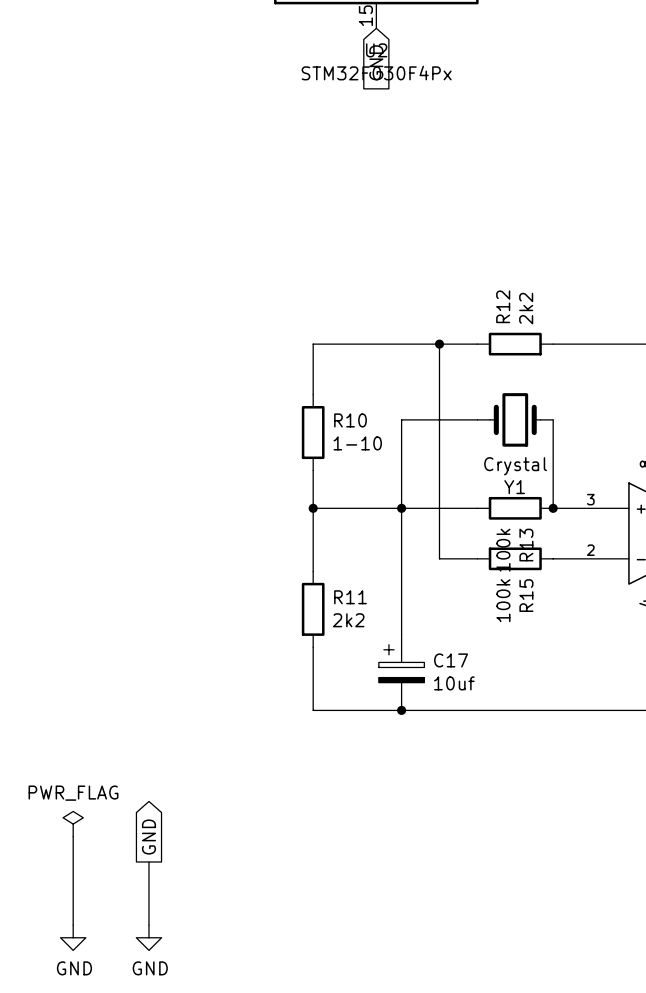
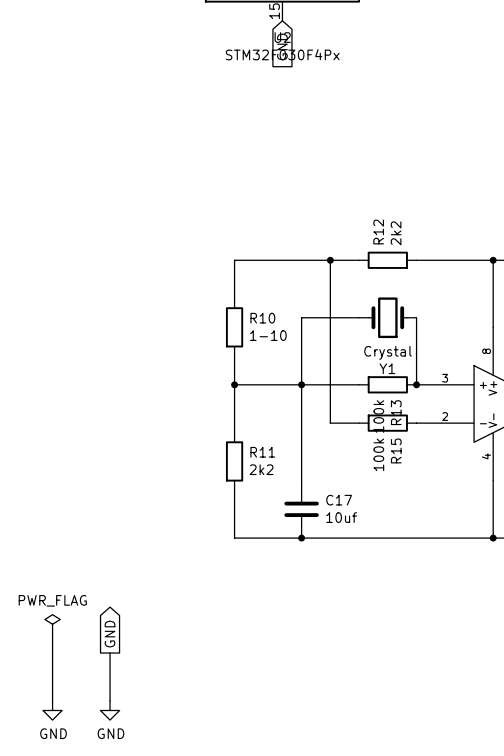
C17 symbol: [378, 634, 425, 711] -> [284, 480, 319, 539]

